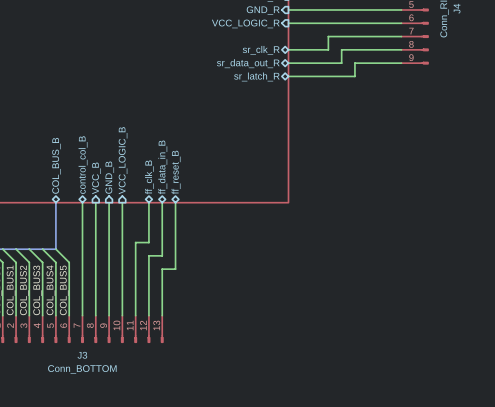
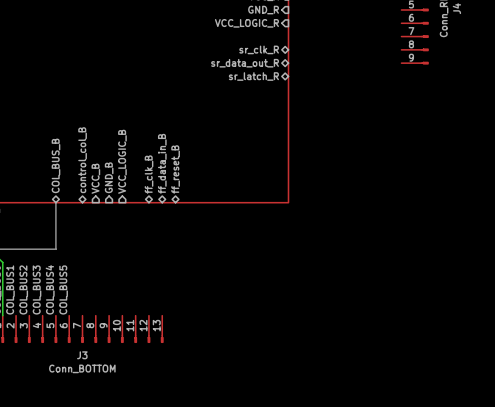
wire: (288, 9) (401, 9) -> none
wire: (288, 23) (401, 23) -> none
wire: (401, 36) (328, 36) (328, 49) (288, 49) -> none
wire: (401, 49) (341, 49) (341, 63) (288, 63) -> none
wire: (401, 63) (354, 63) (354, 76) (288, 76) -> none
wire: (82, 202) (82, 315) -> none
wire: (95, 202) (95, 315) -> none
wire: (109, 202) (109, 315) -> none
wire: (122, 202) (122, 315) -> none
wire: (148, 202) (148, 242) (135, 242) (135, 315) -> none
wire: (162, 202) (162, 255) (148, 255) (148, 315) -> none
wire: (175, 202) (175, 269) (162, 269) (162, 315) -> none
wire: (2, 249) (16, 262) (16, 315) -> none
wire: (16, 249) (29, 262) (29, 315) -> none
wire: (29, 249) (42, 262) (42, 315) -> none
wire: (42, 249) (55, 262) (55, 315) -> none
wire: (55, 249) (69, 262) (69, 315) -> none

